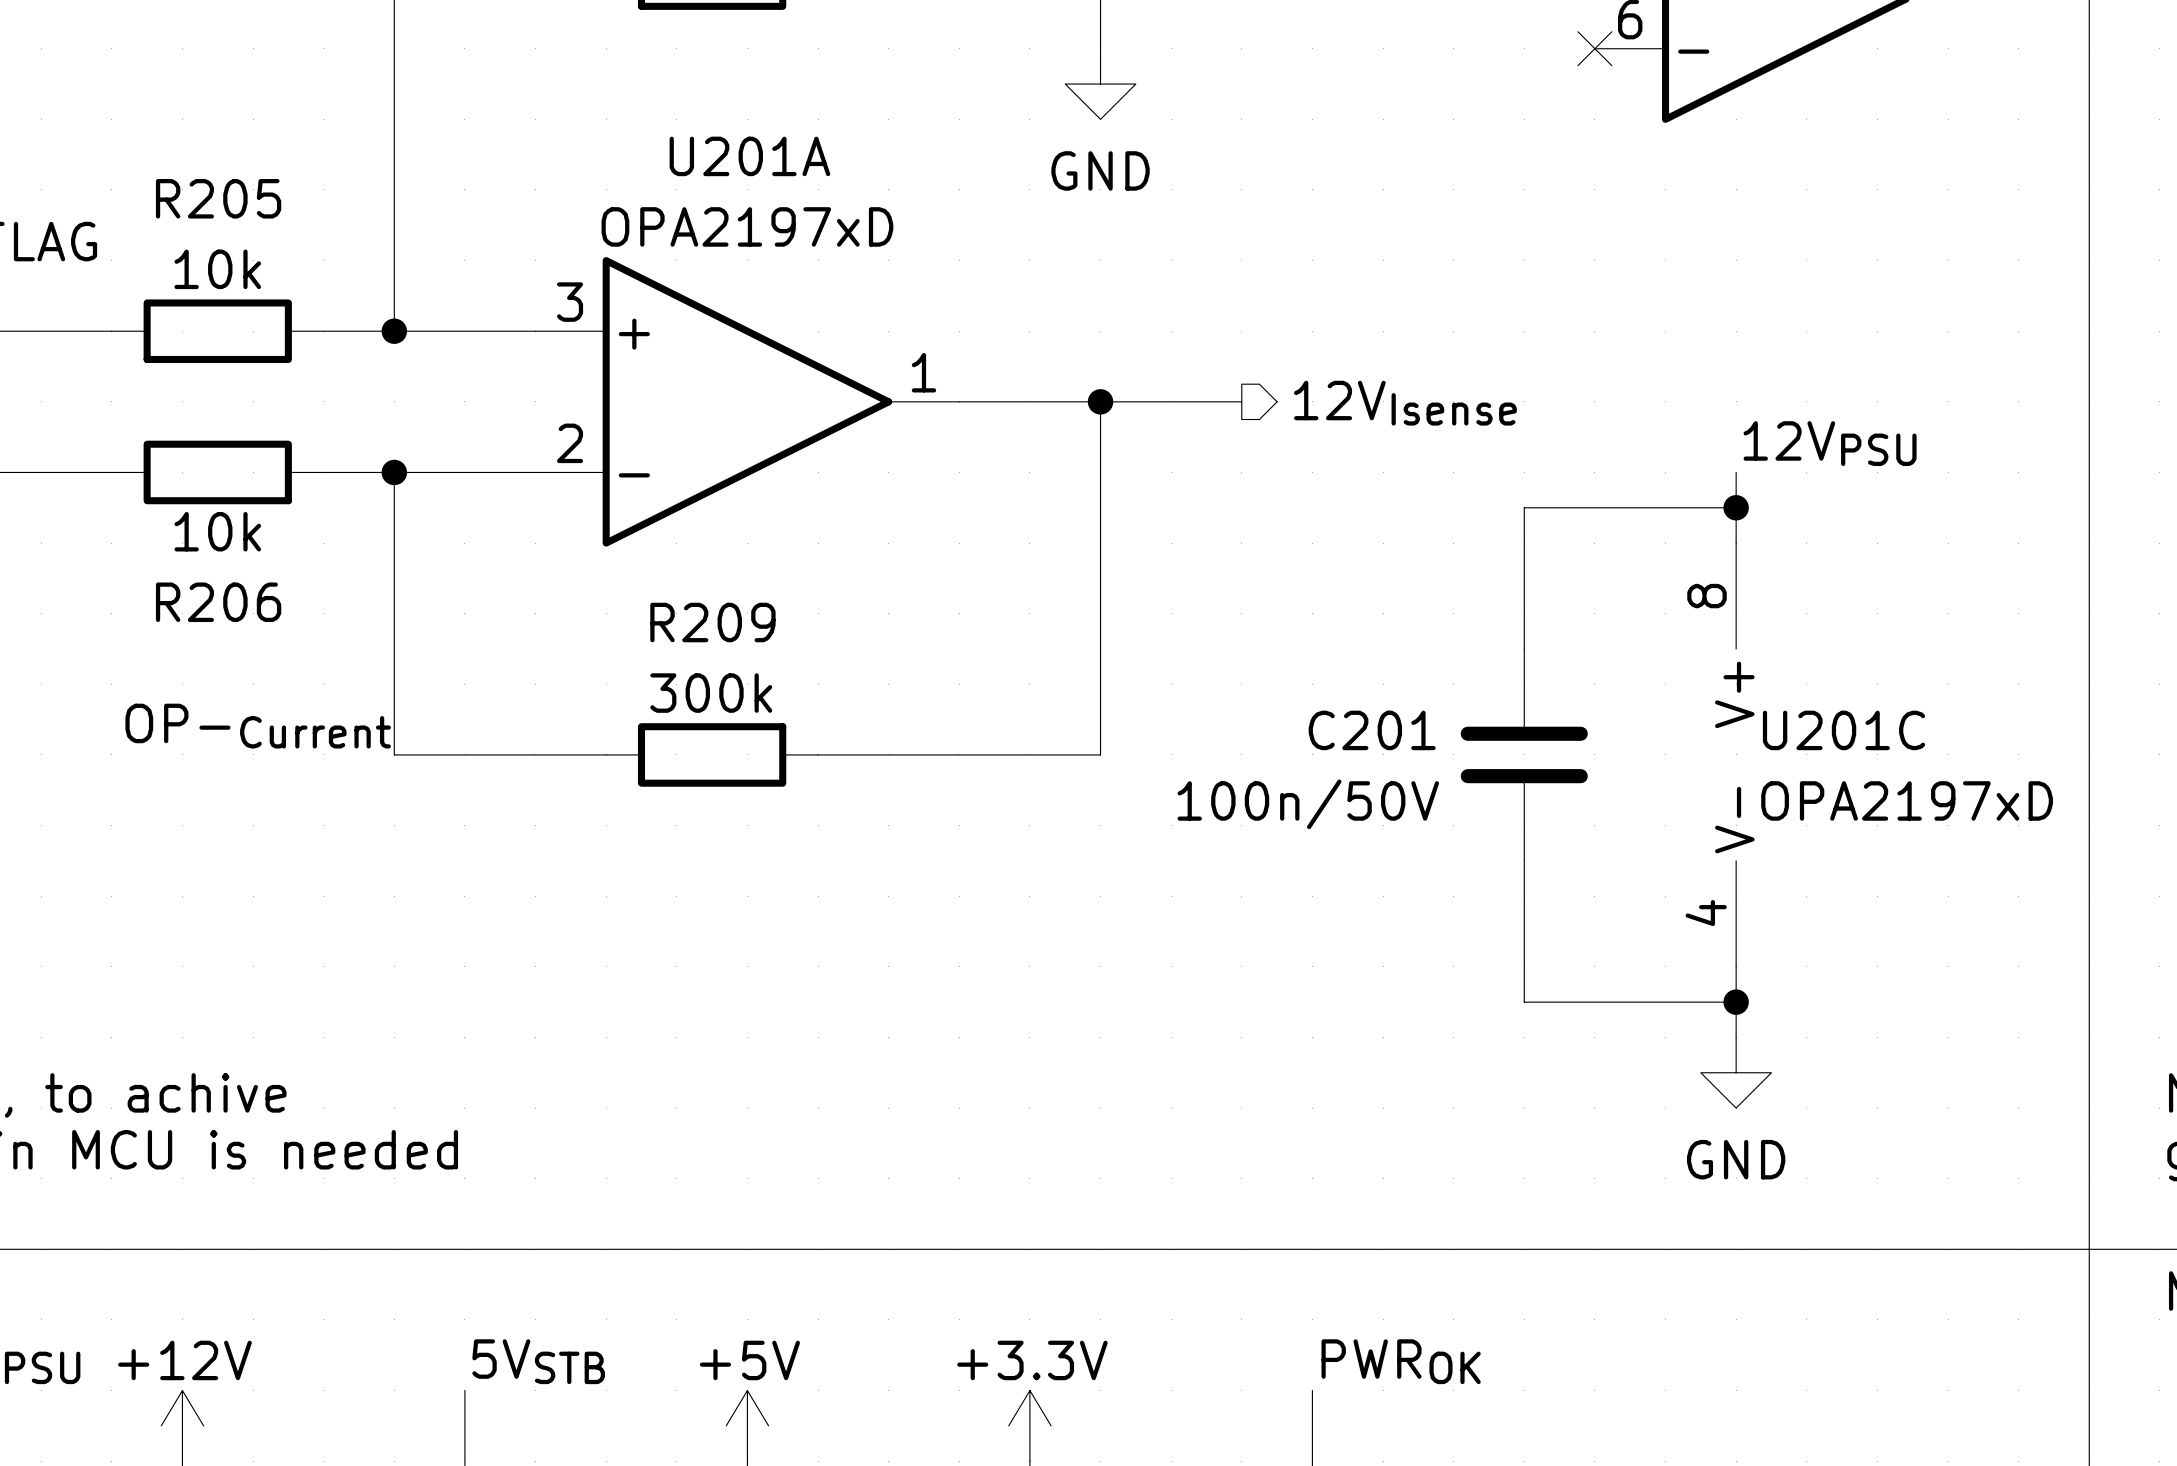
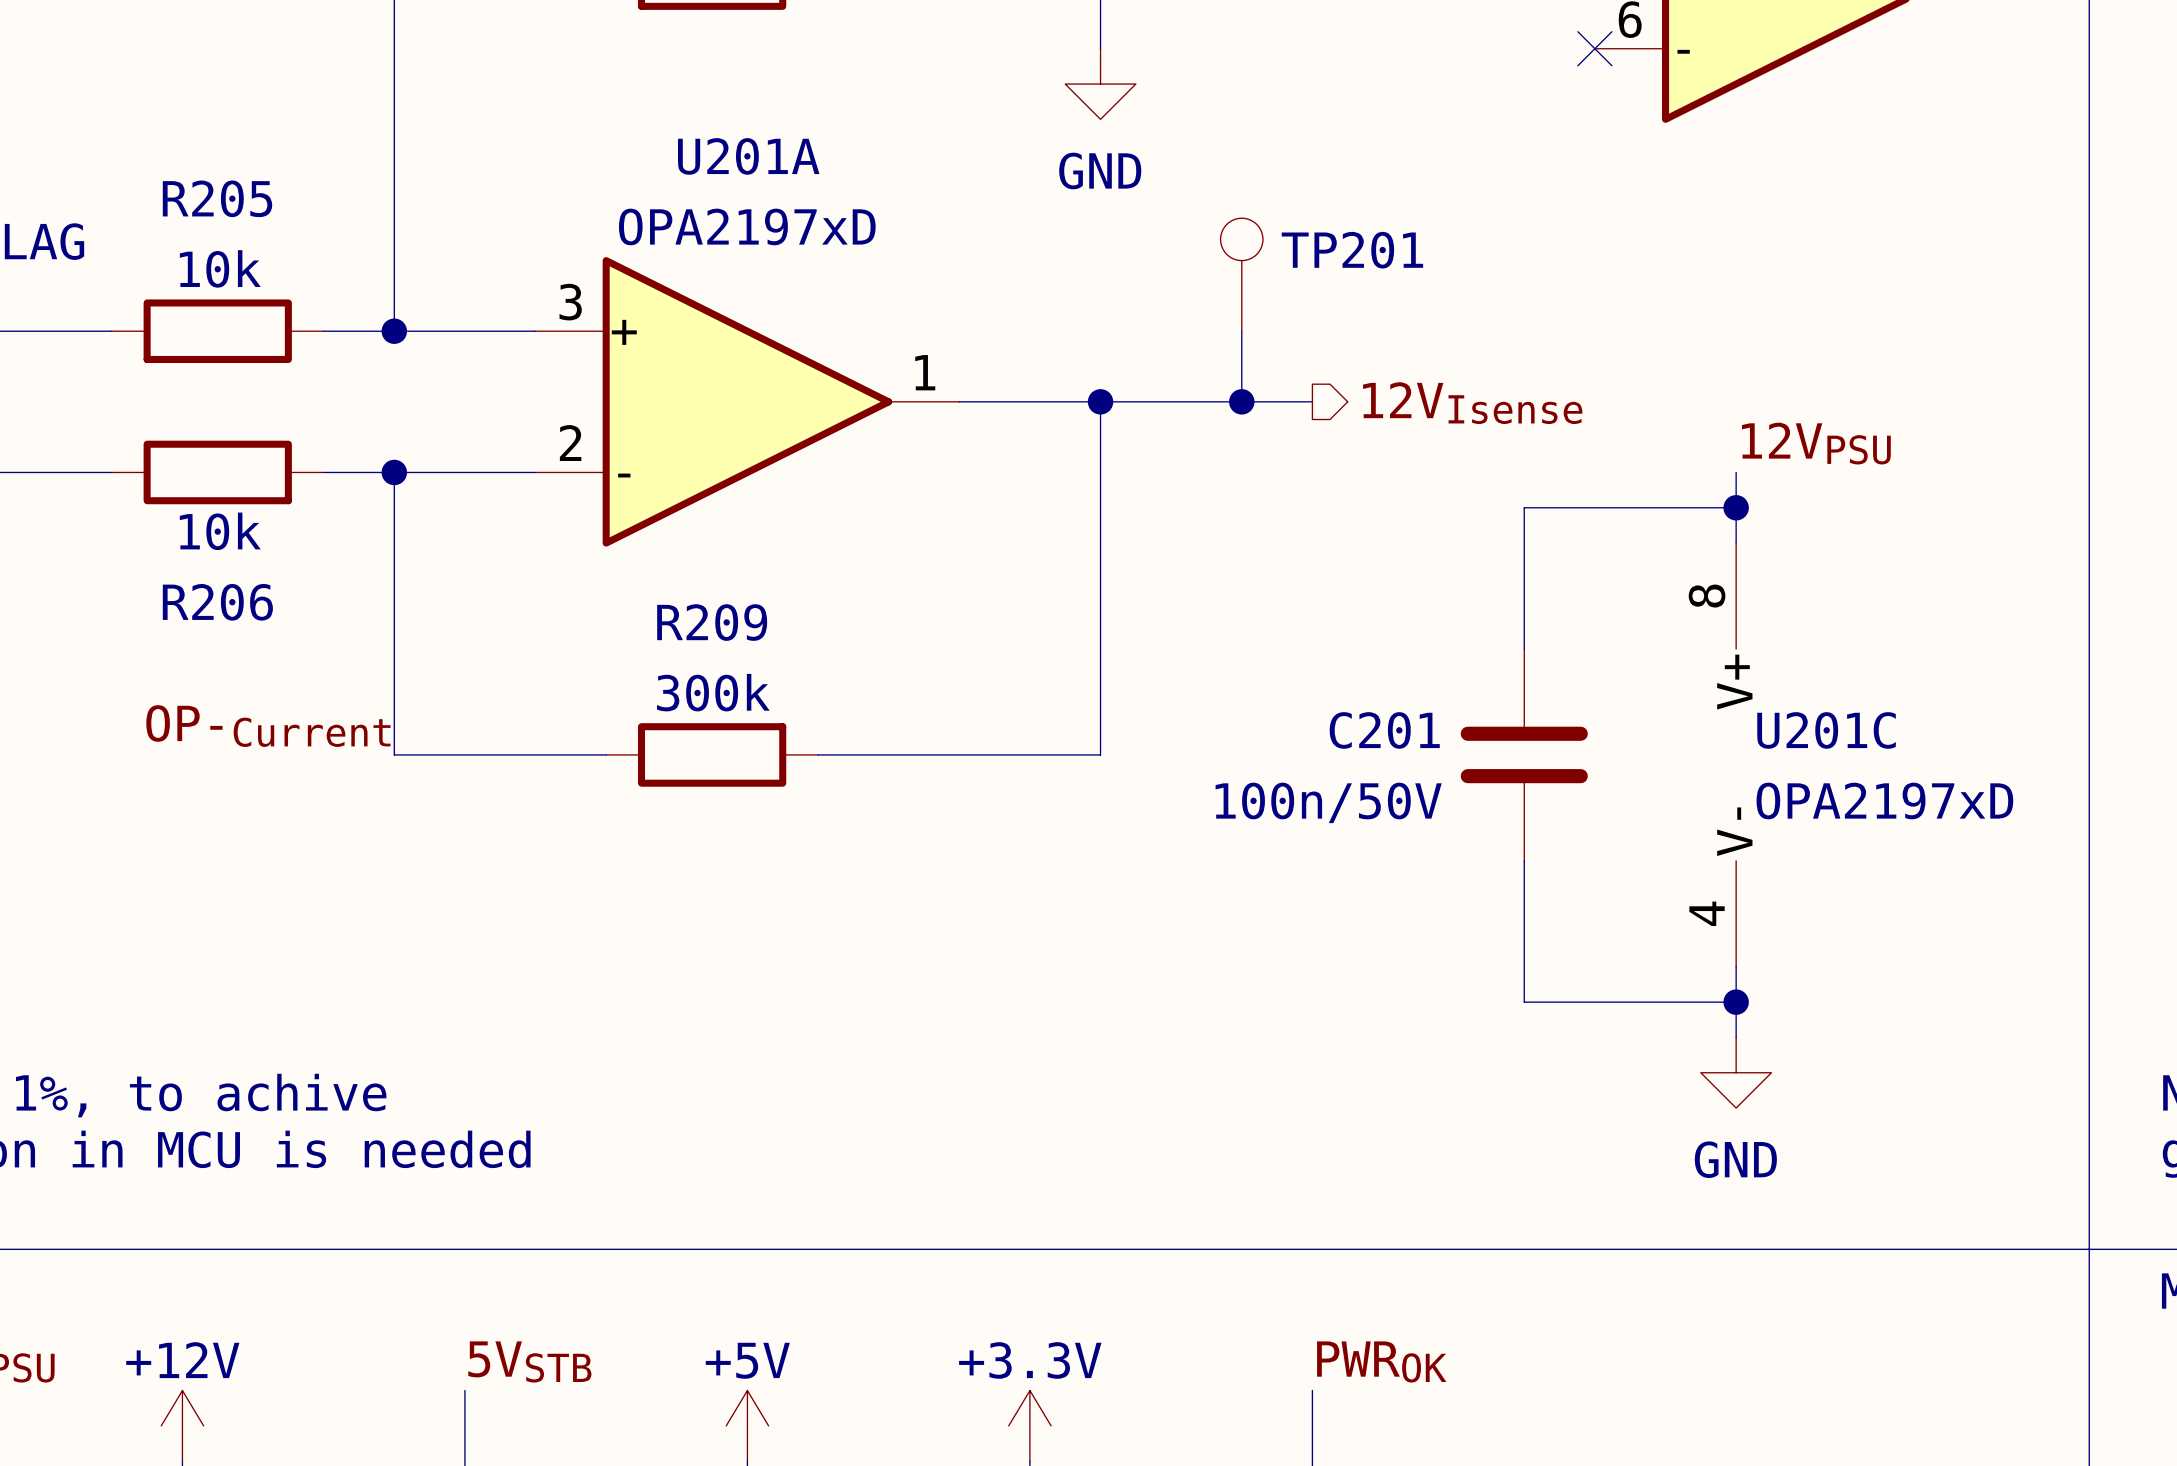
TP201: none -> (1241, 274)
wire: none -> (1241, 331) (1241, 401) (1312, 401)
junction: none -> (1241, 401)
hierarchical label position: 12VIsense (1405, 403) -> 12VIsense (1472, 403)

